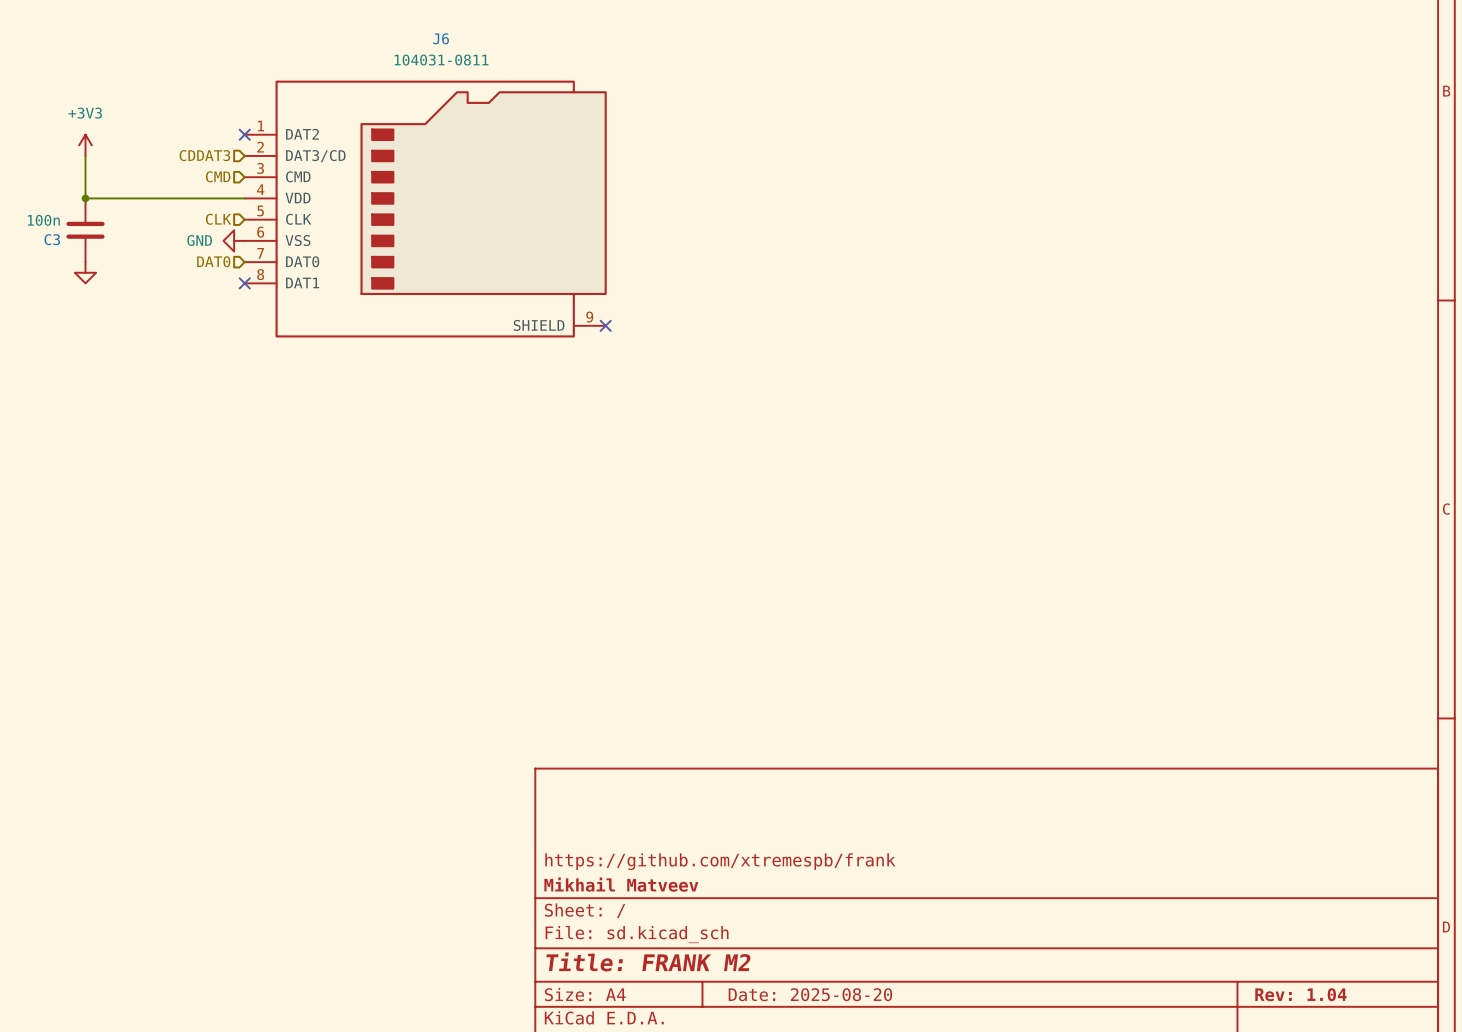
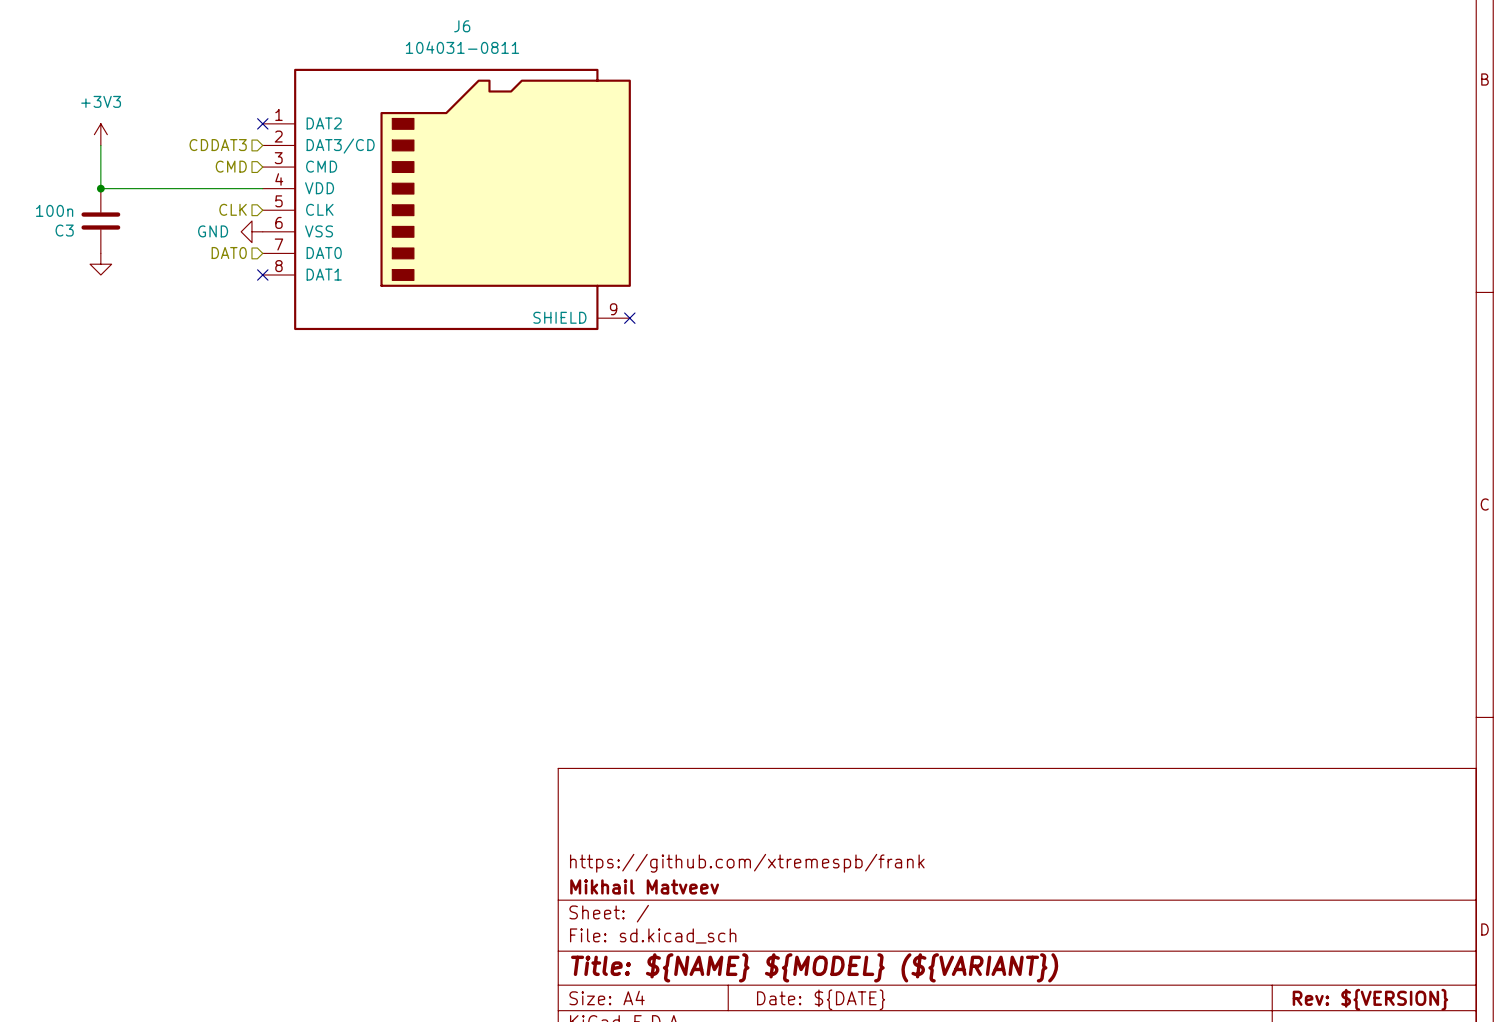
title block: Title: FRANK M2 (648, 961) -> Title: ${NAME} ${MODEL} (${VARIANT}) (814, 967)
title block: Date: 2025-08-20 (810, 994) -> Date: ${DATE} (821, 999)
title block: Rev: 1.04 (1300, 994) -> Rev: ${VERSION} (1370, 999)

